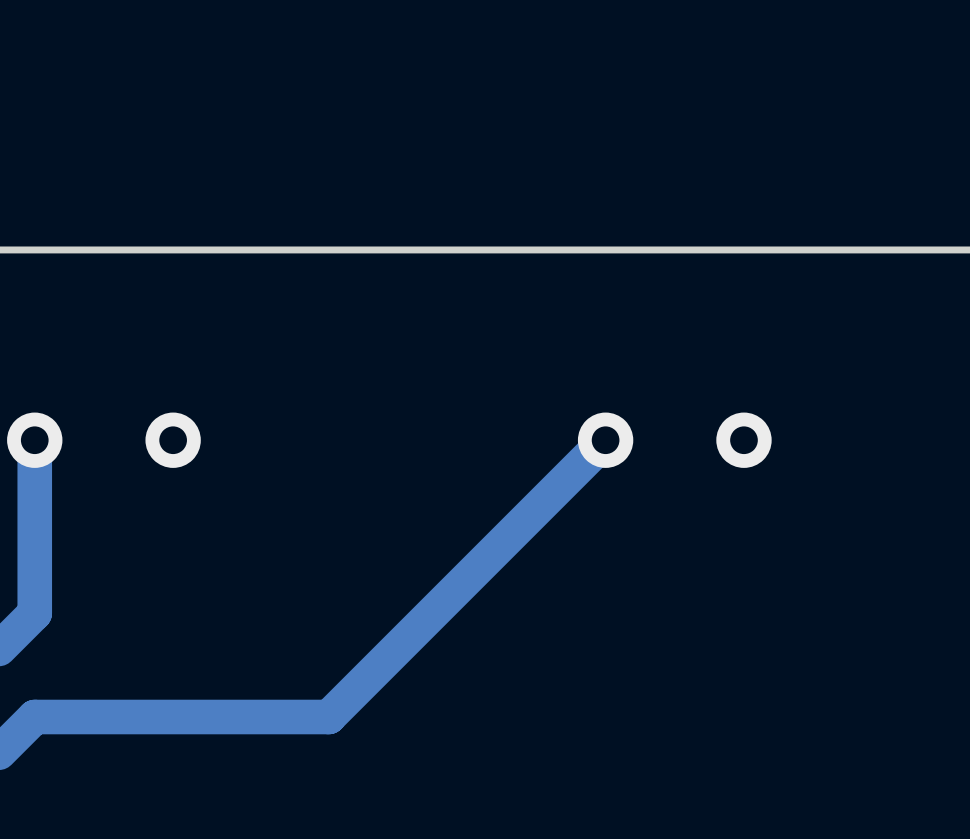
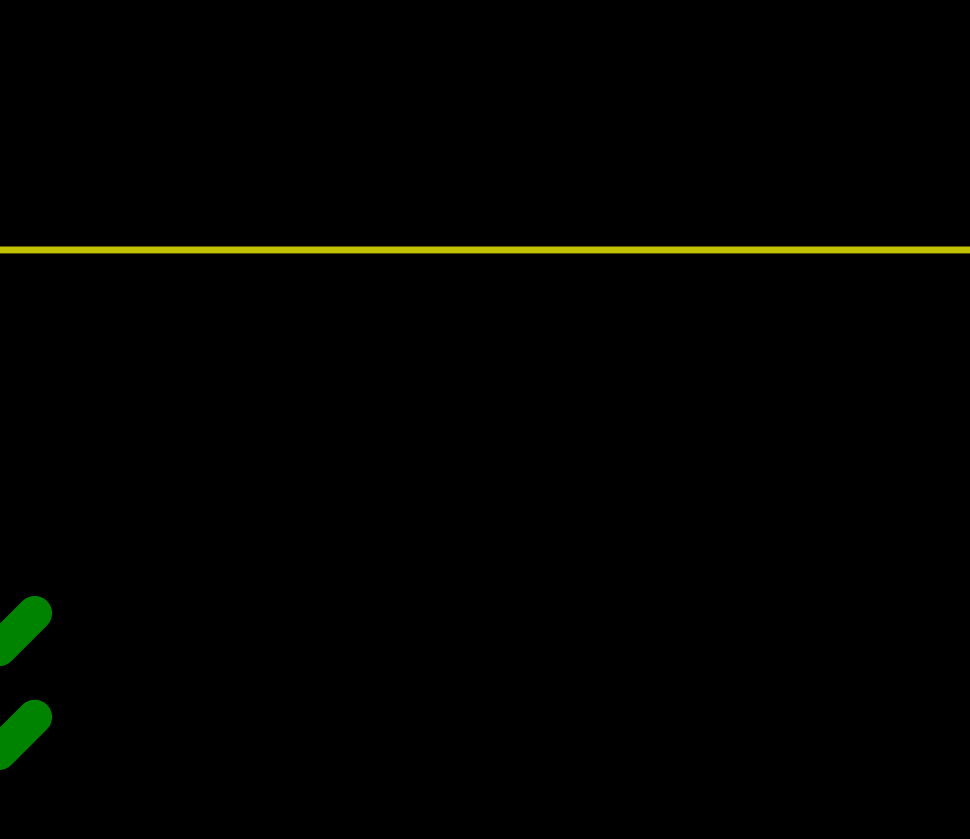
track: (34, 440) (34, 613) -> none
via: (34, 440) -> none
via: (173, 440) -> none
track: (605, 440) (328, 717) (34, 717) -> none
via: (605, 440) -> none
via: (743, 440) -> none

